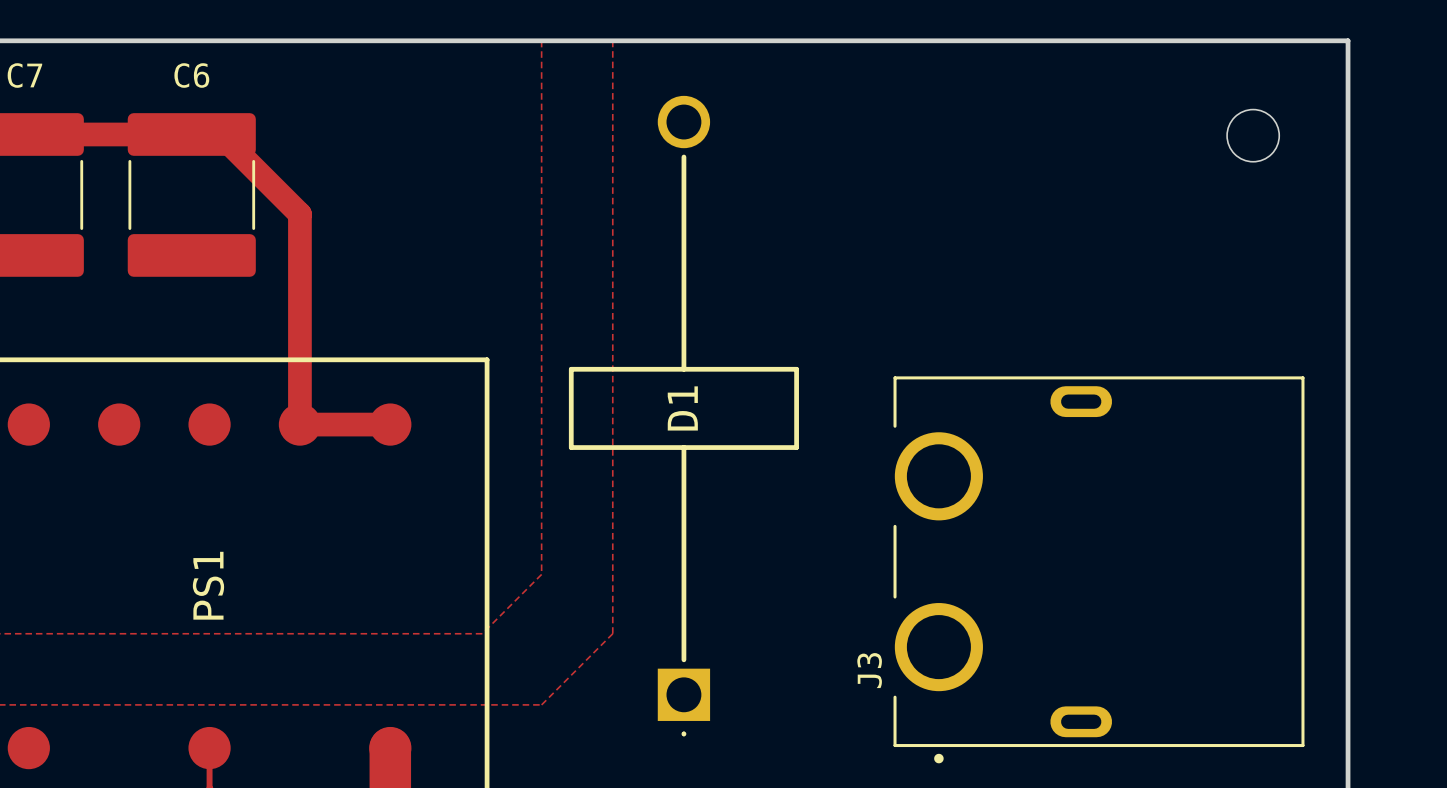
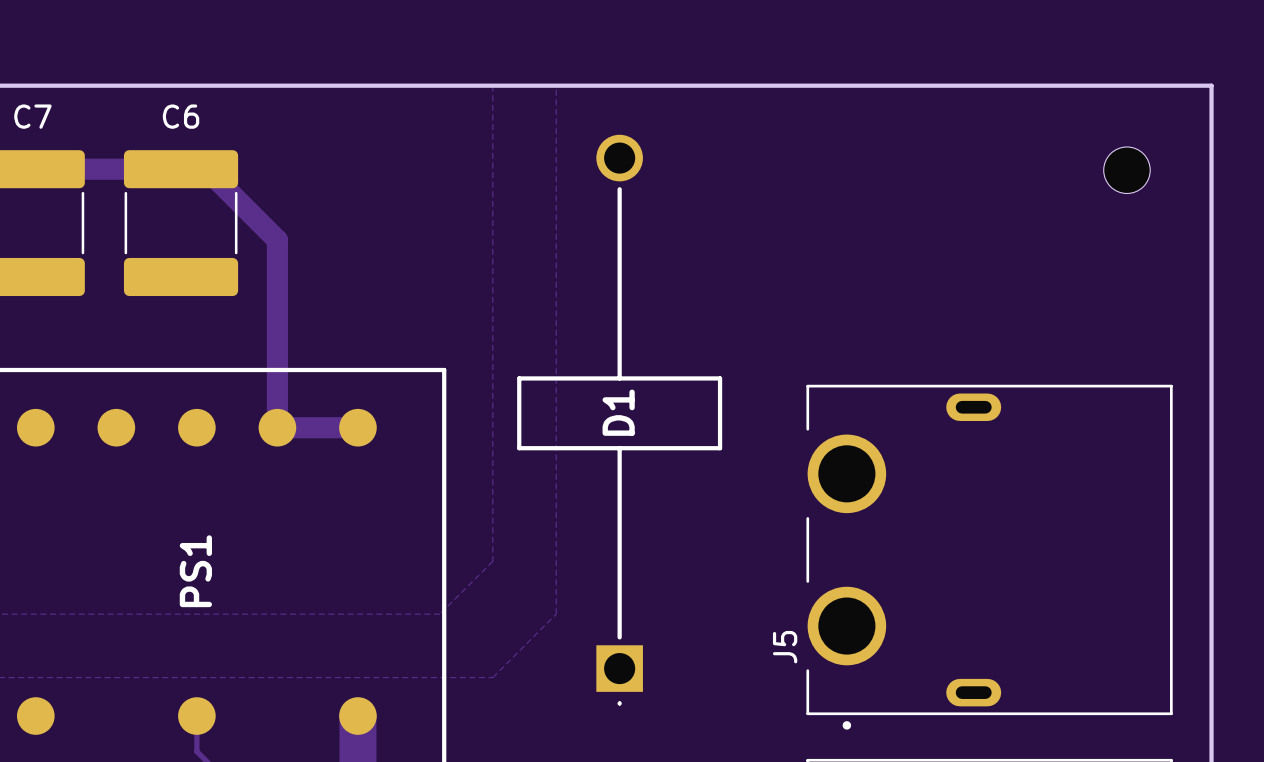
J3 name: J3 (869, 670) -> J5 (785, 647)

